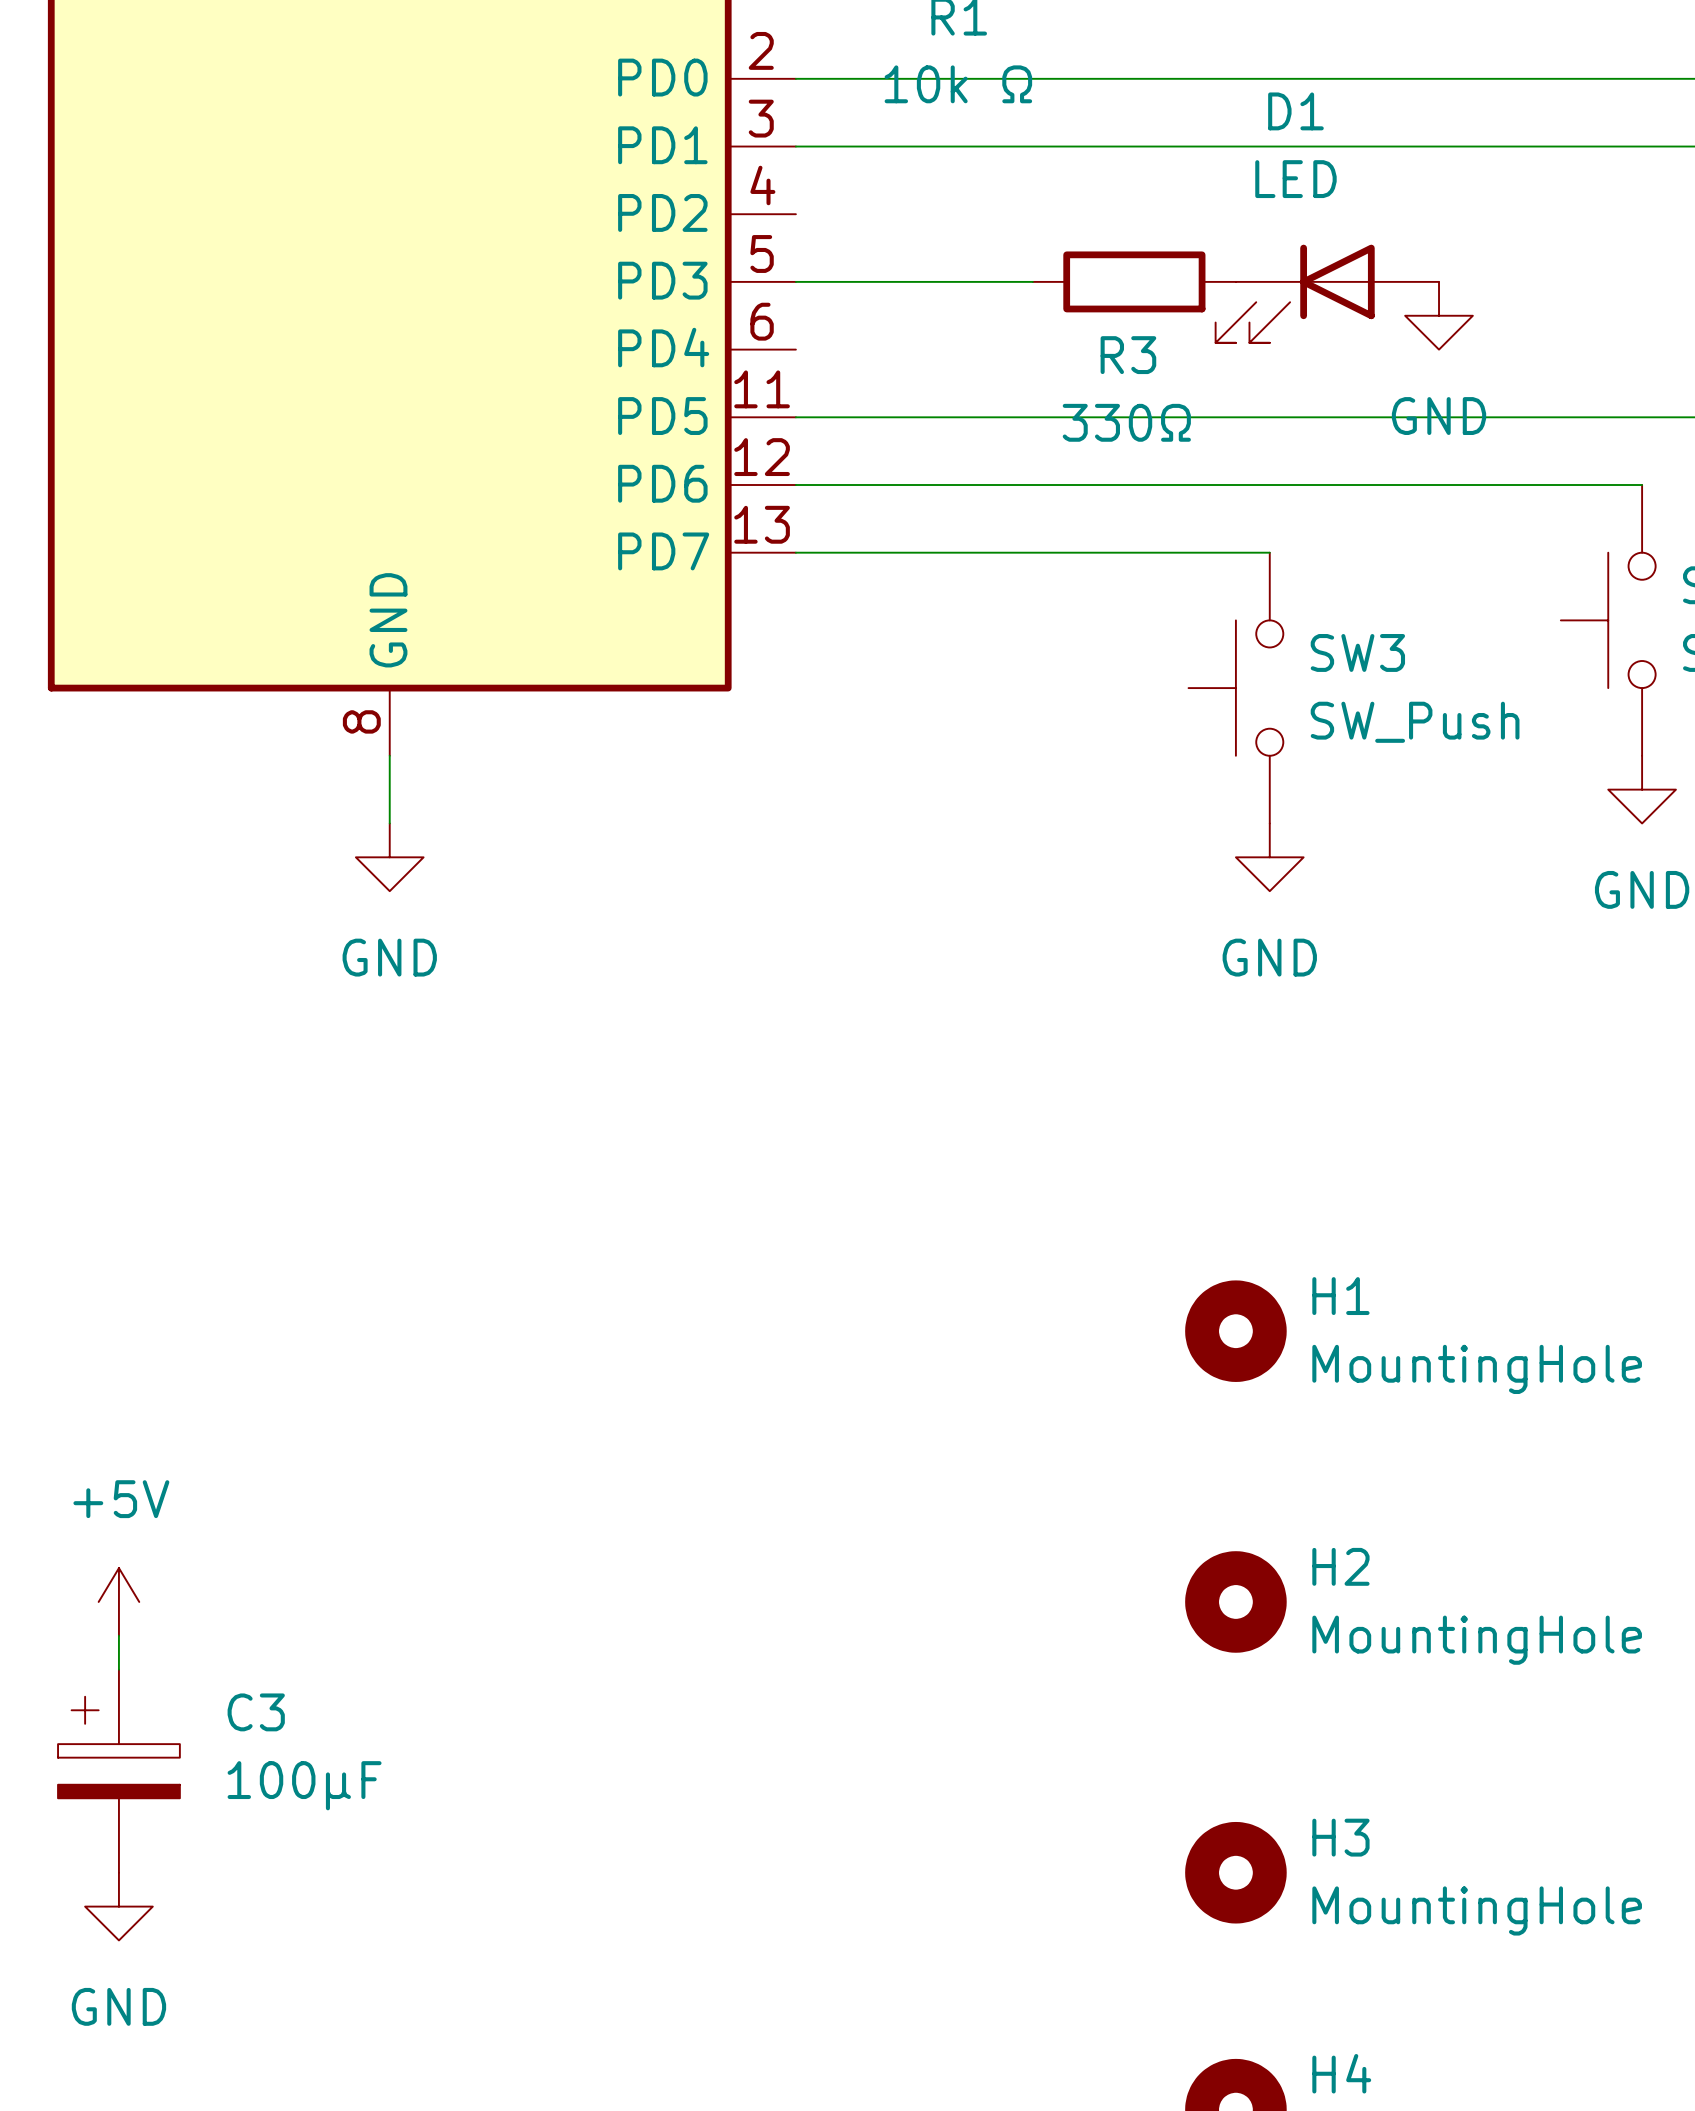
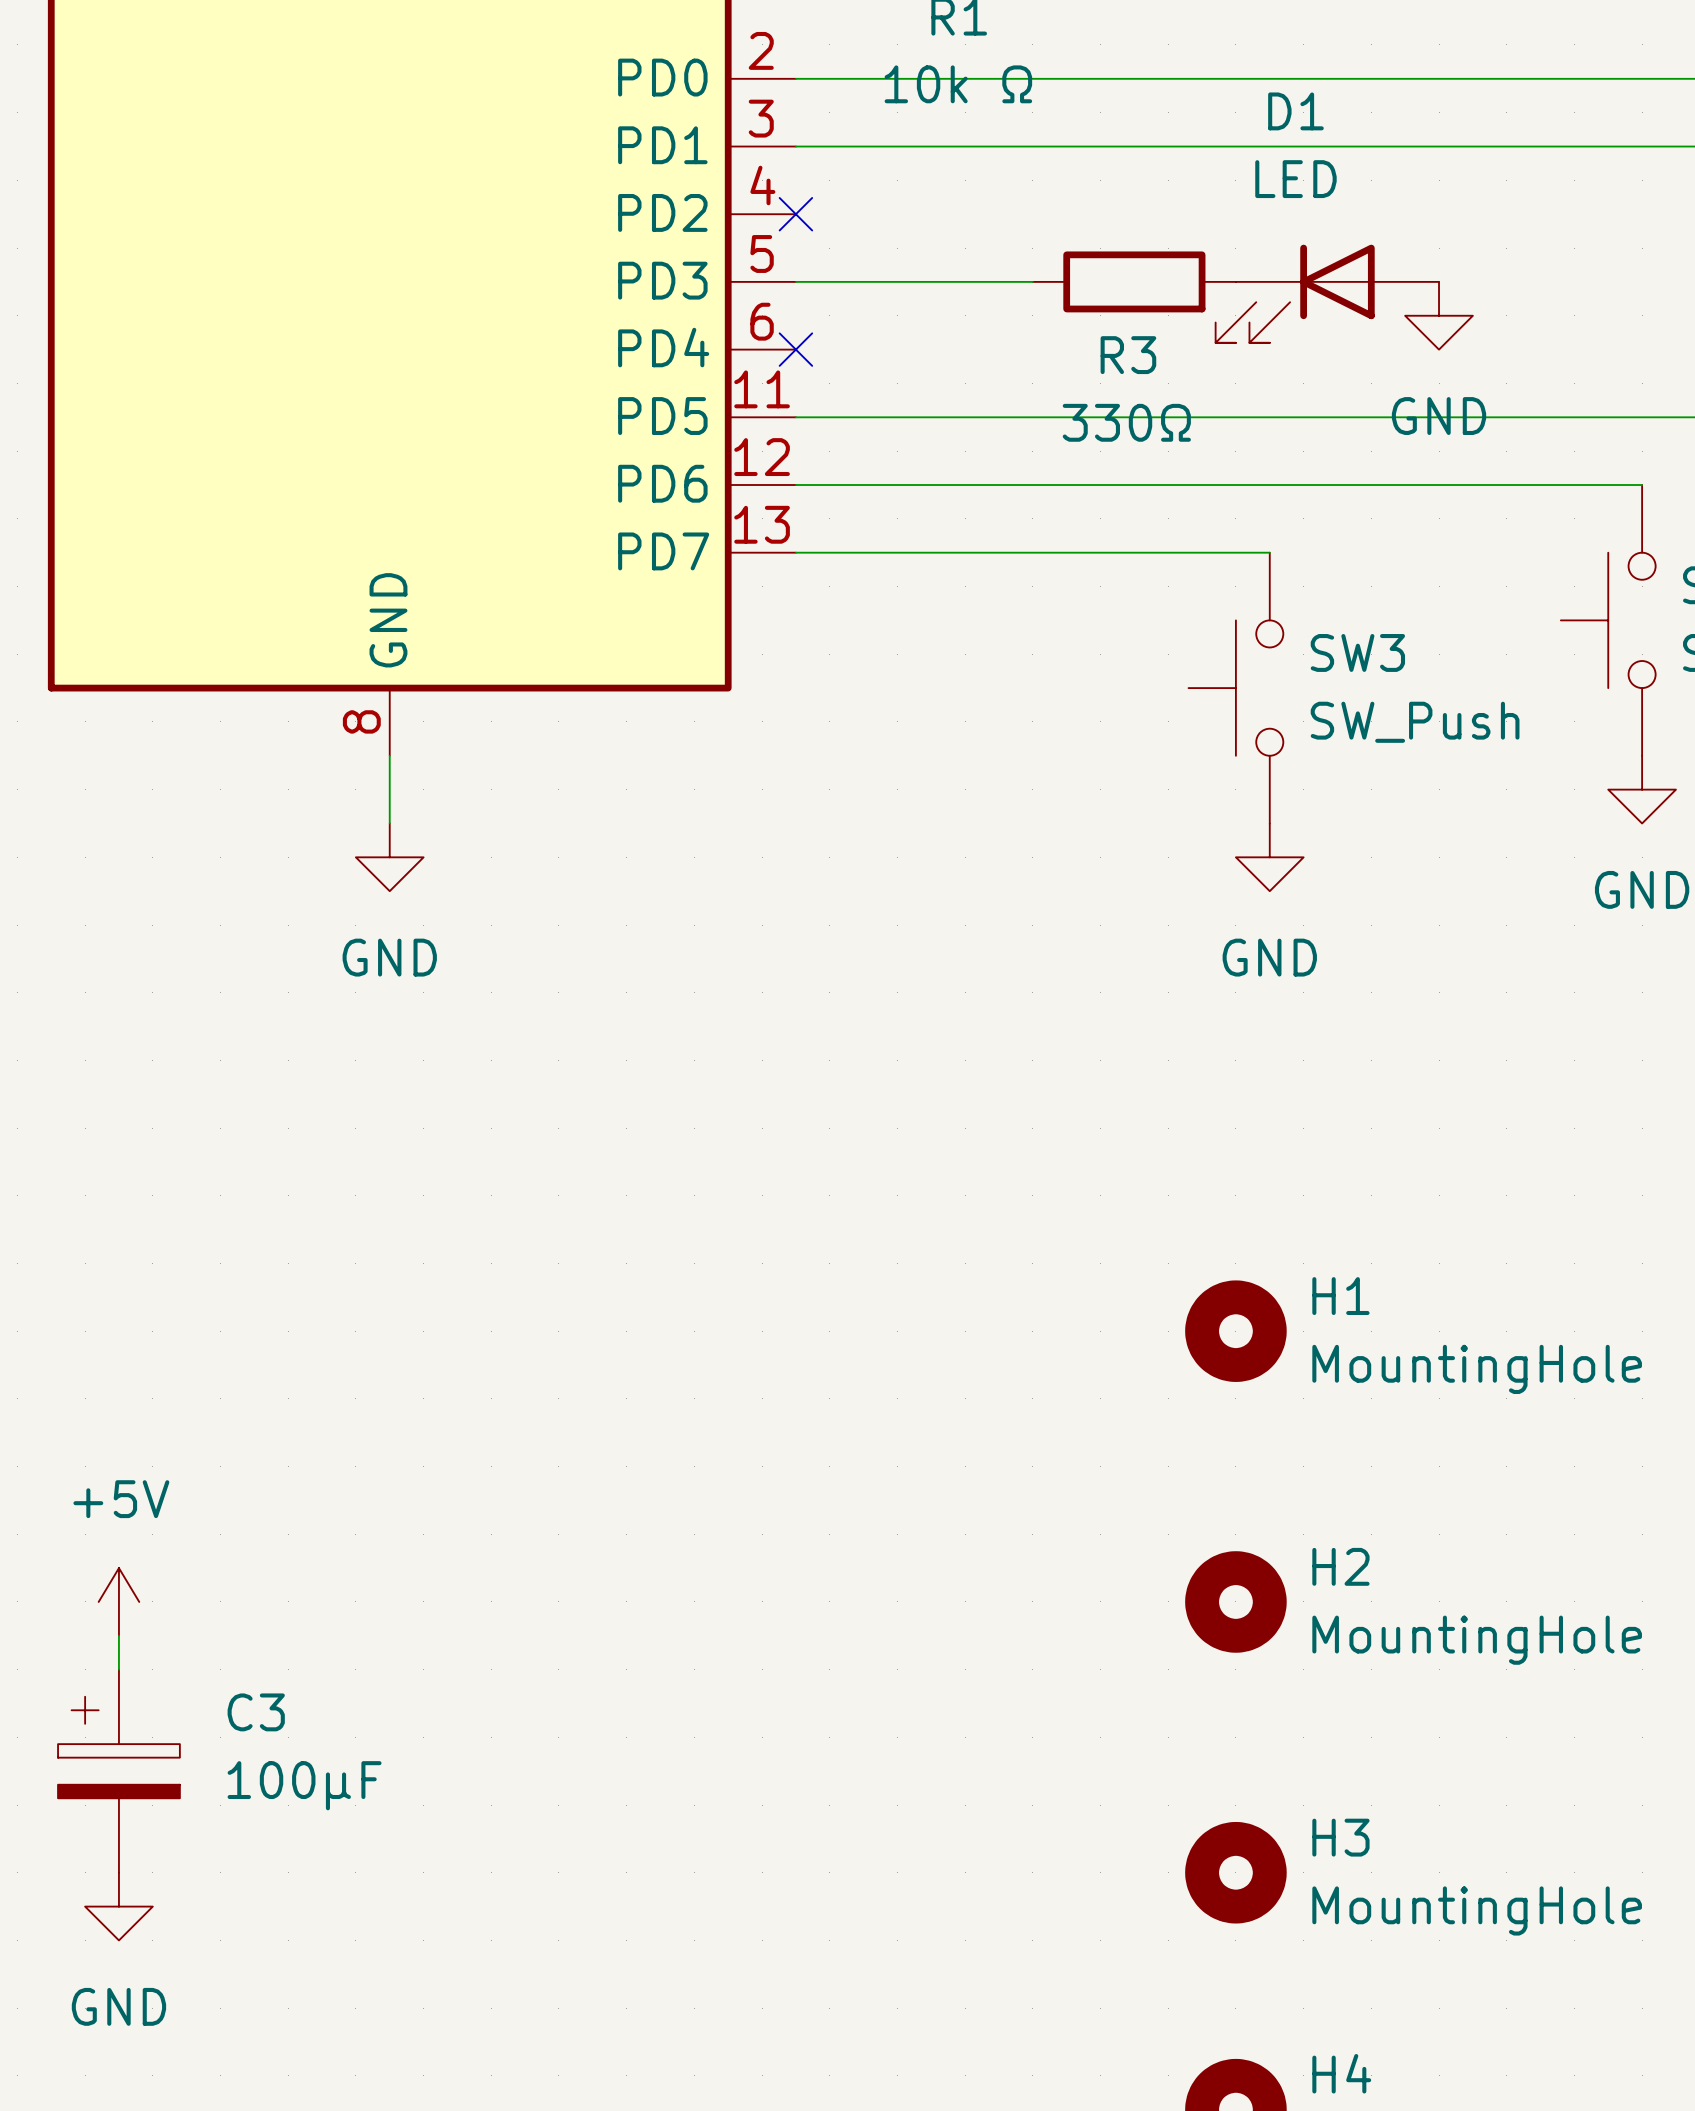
no-connect mark: none -> (795, 214)
no-connect mark: none -> (795, 349)

